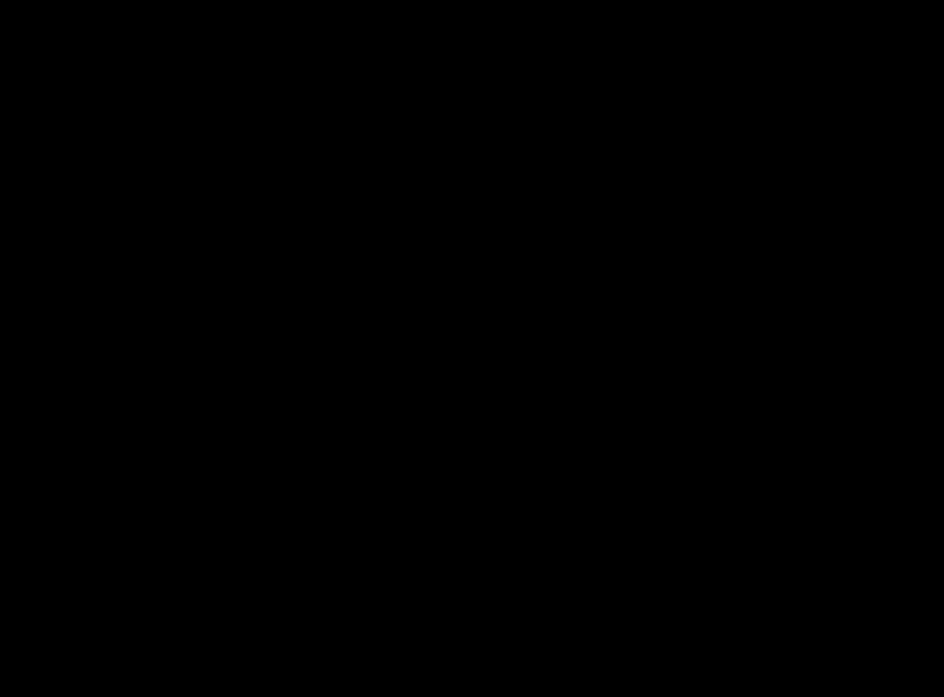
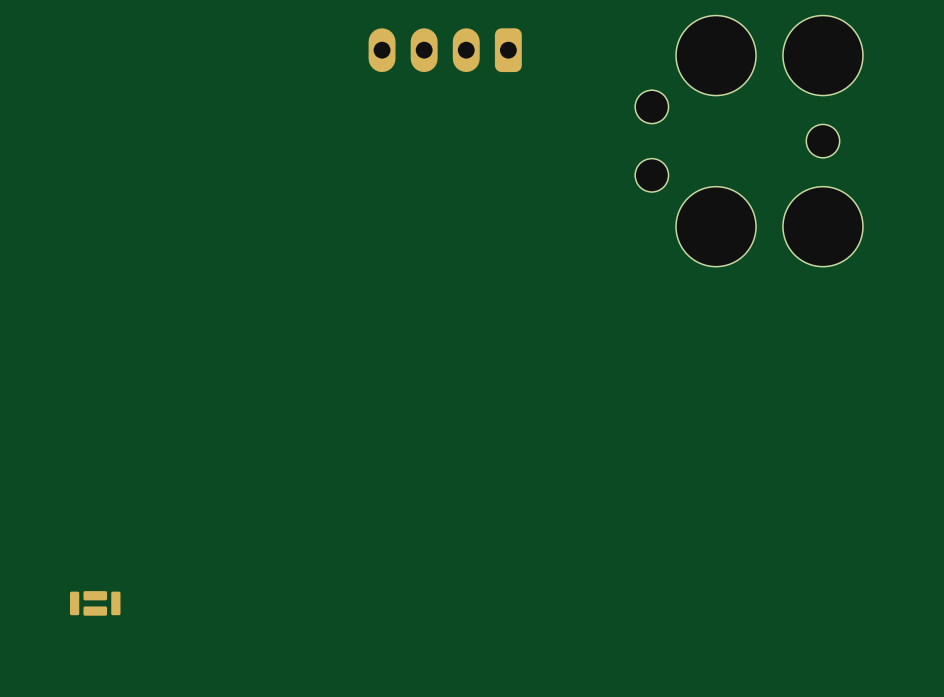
part: none -> (445, 50)
part: none -> (749, 141)
part: none -> (95, 603)

